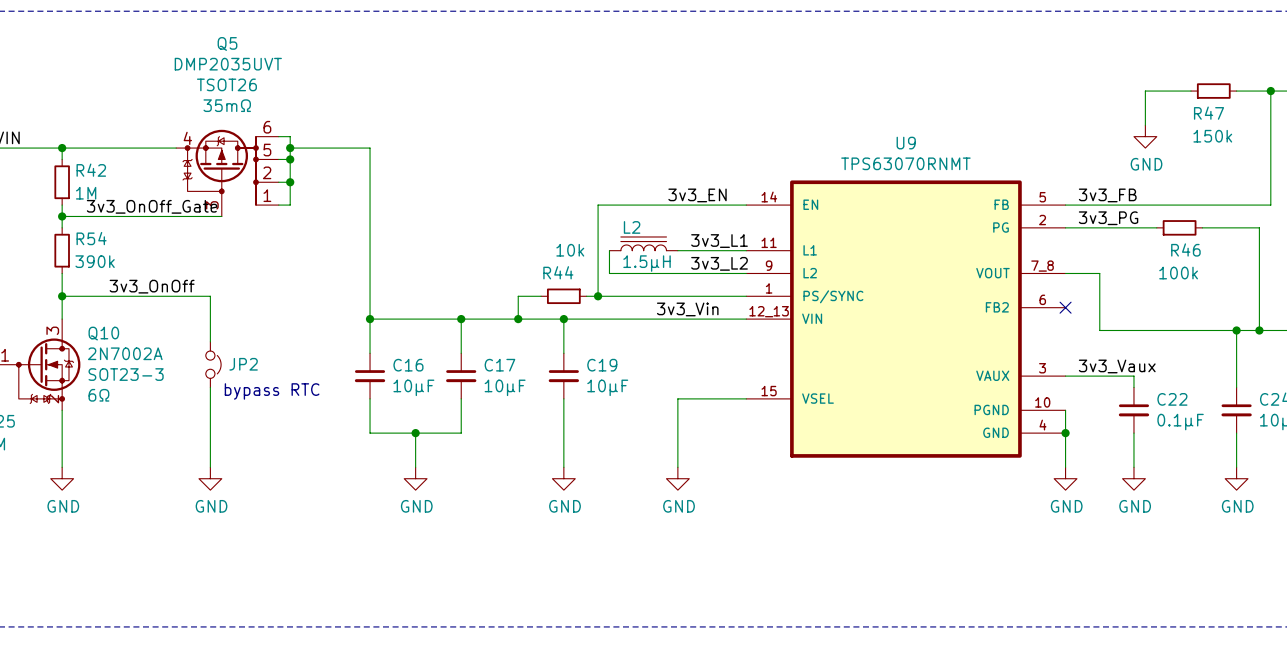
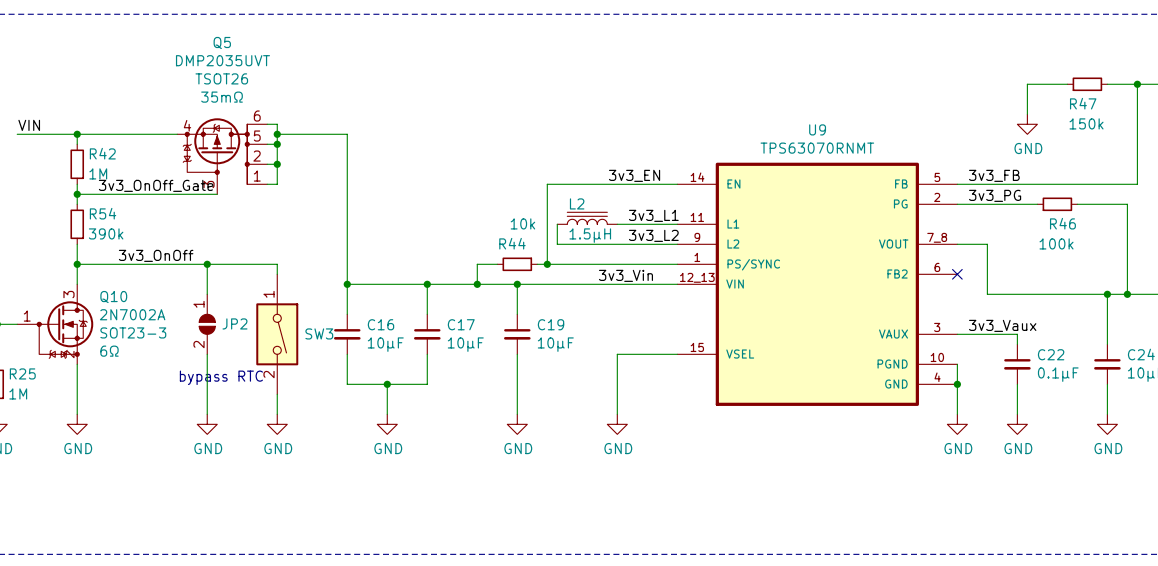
wire: none -> (207, 264) (277, 264) (277, 274)
junction: none -> (207, 264)
JP2 symbol: [205, 341, 222, 388] -> [199, 294, 216, 355]
SW3: none -> (277, 334)
text position: bypass RTC (272, 391) -> bypass RTC (221, 377)
wire: none -> (277, 394) (277, 414)
power symbol: none -> GND (277, 424)

